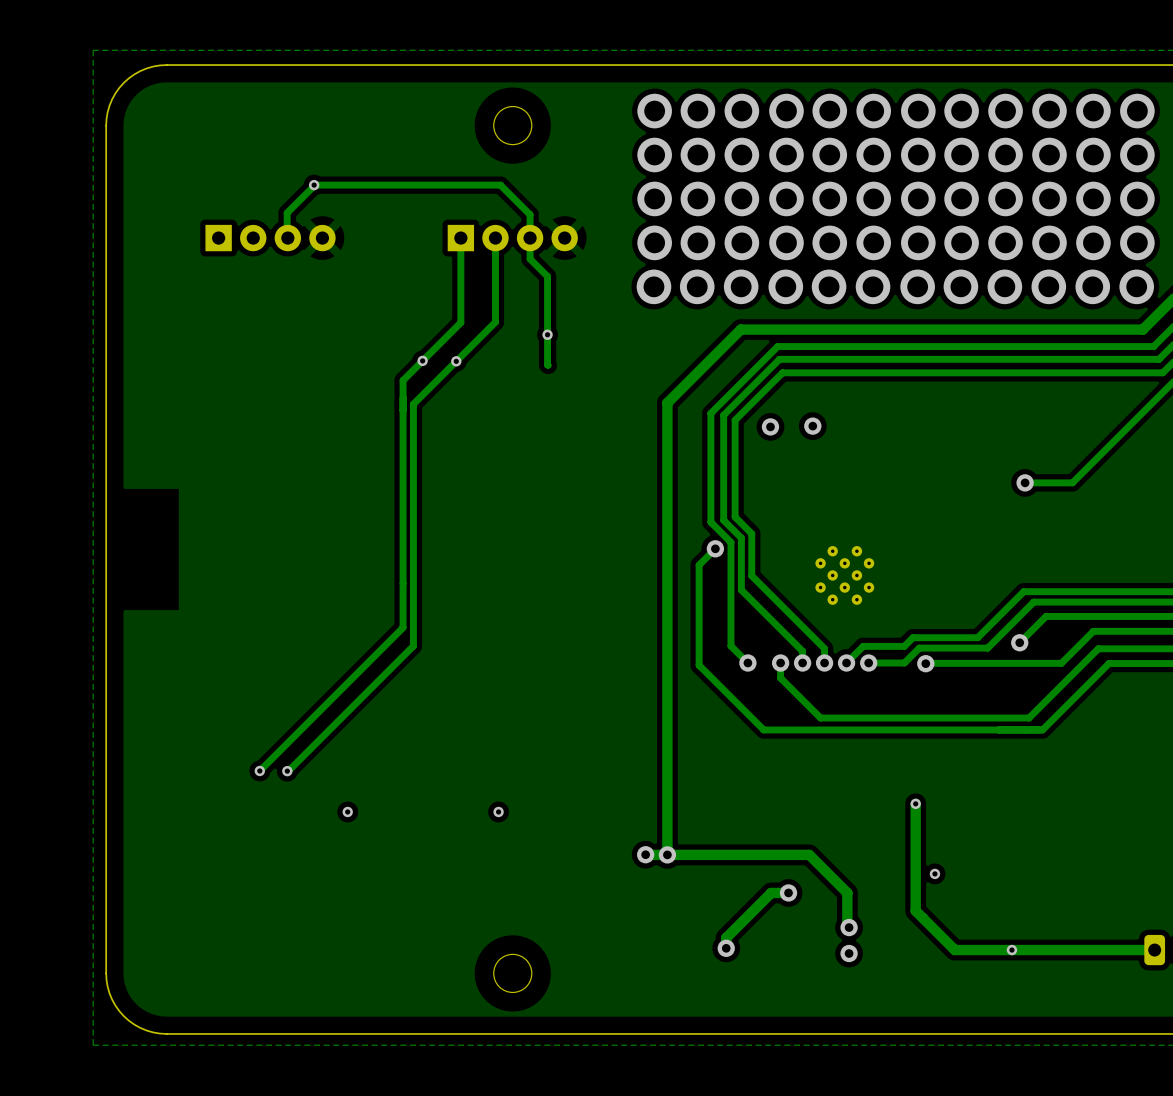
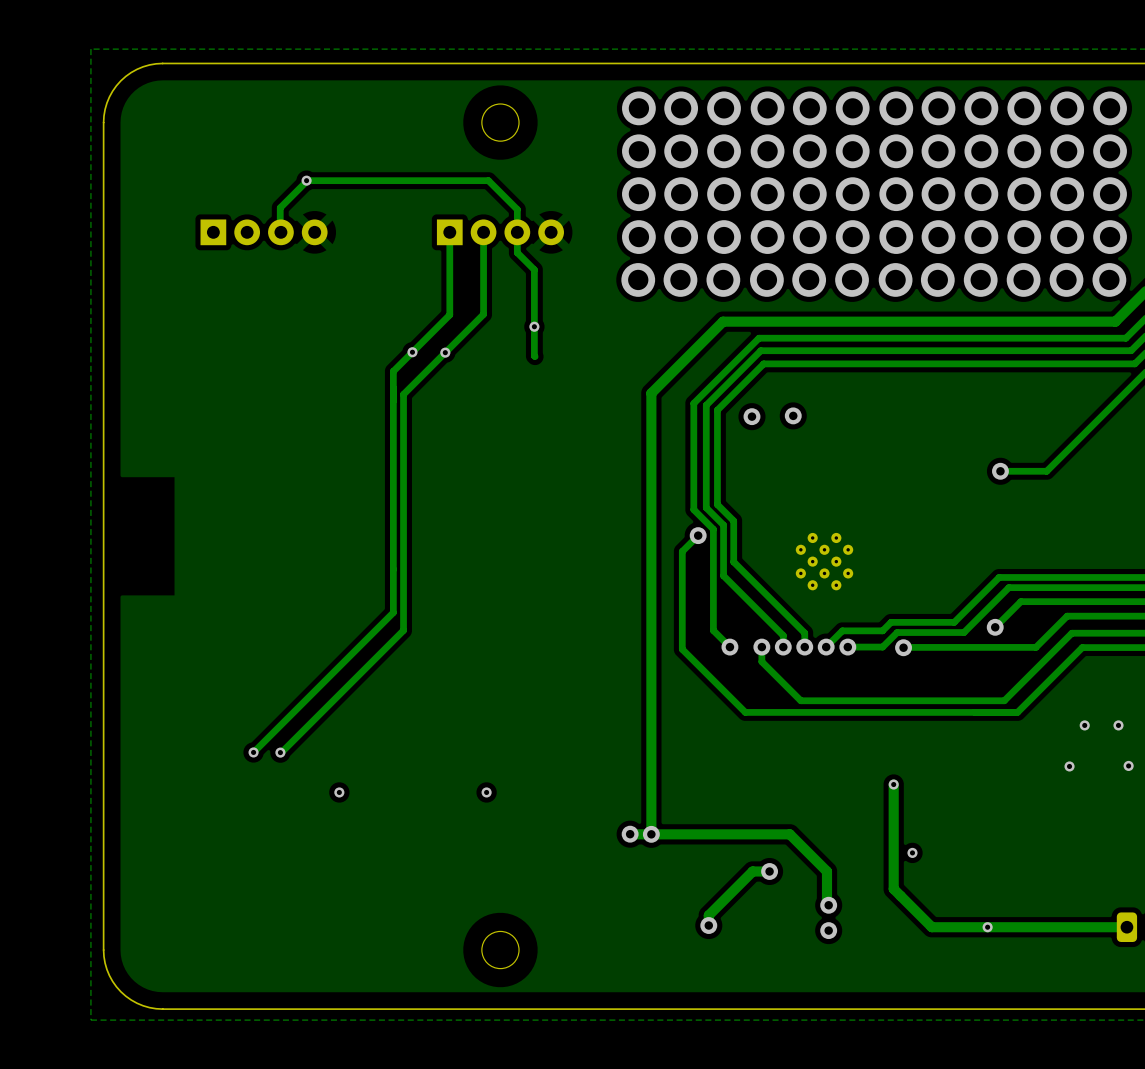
via: none -> (1084, 725)
via: none -> (1118, 725)
via: none -> (1128, 765)
via: none -> (1069, 766)

